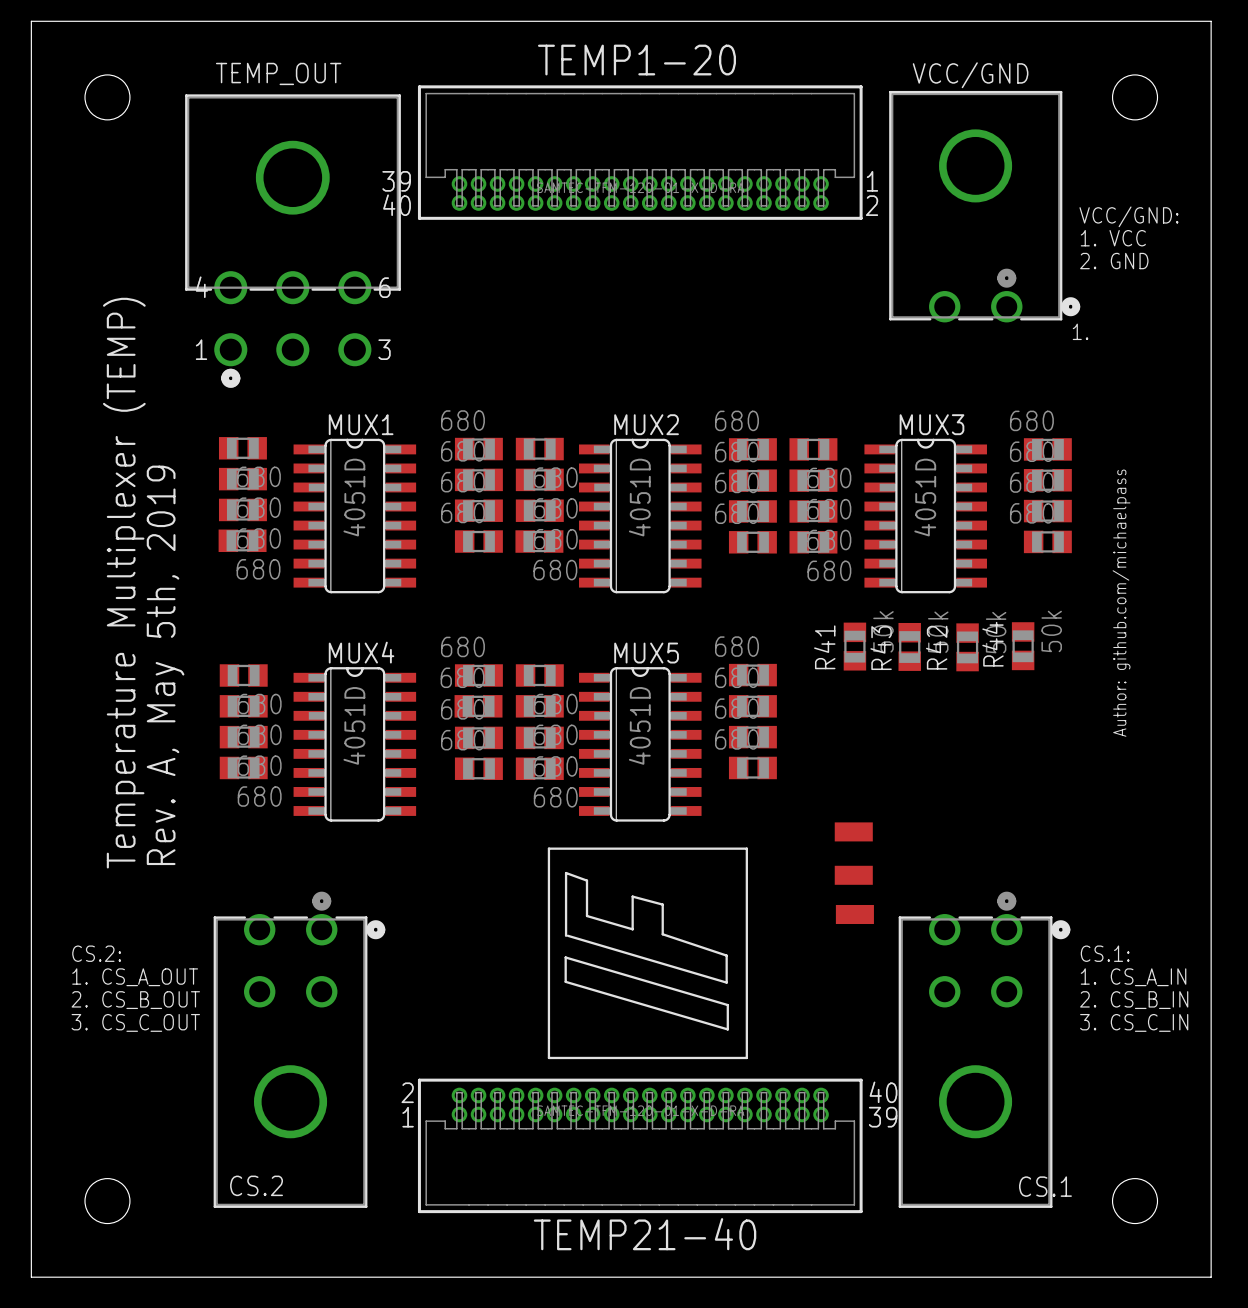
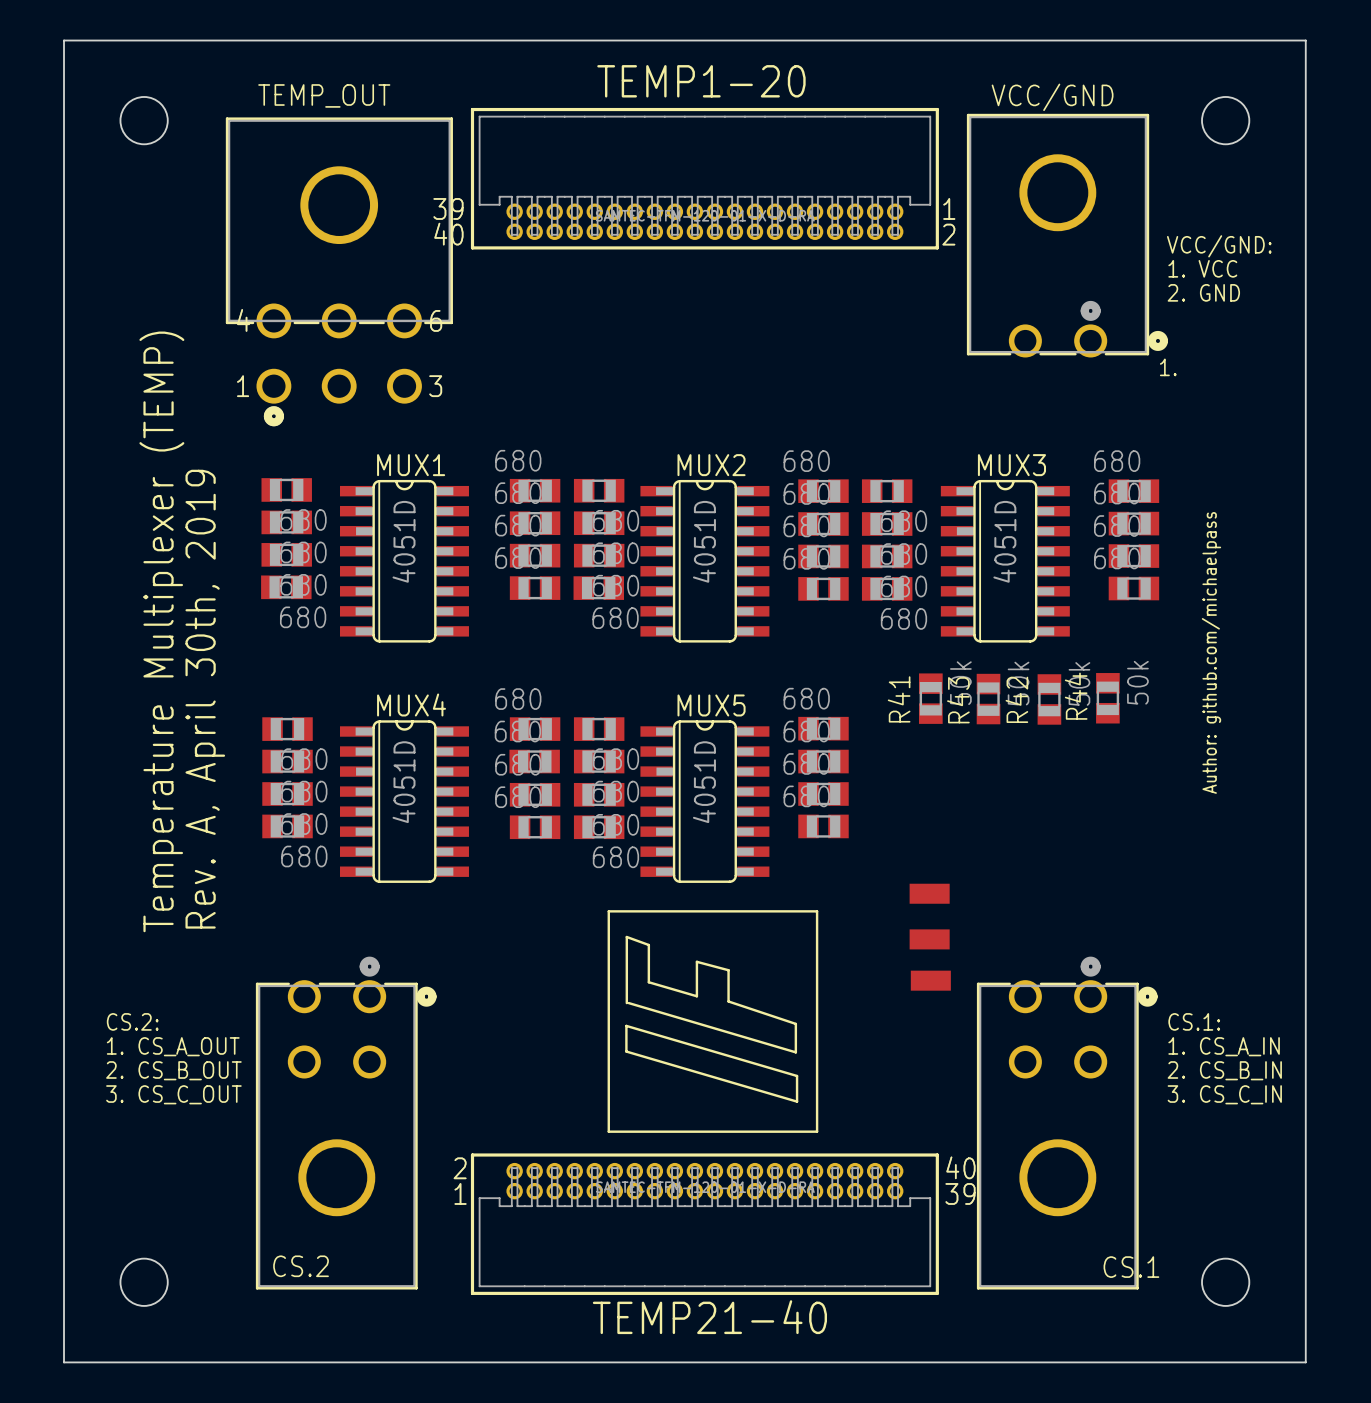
text: Rev. A, May 5th, 2019 (165, 665) -> Rev. A, April 30th, 2019 (205, 699)

